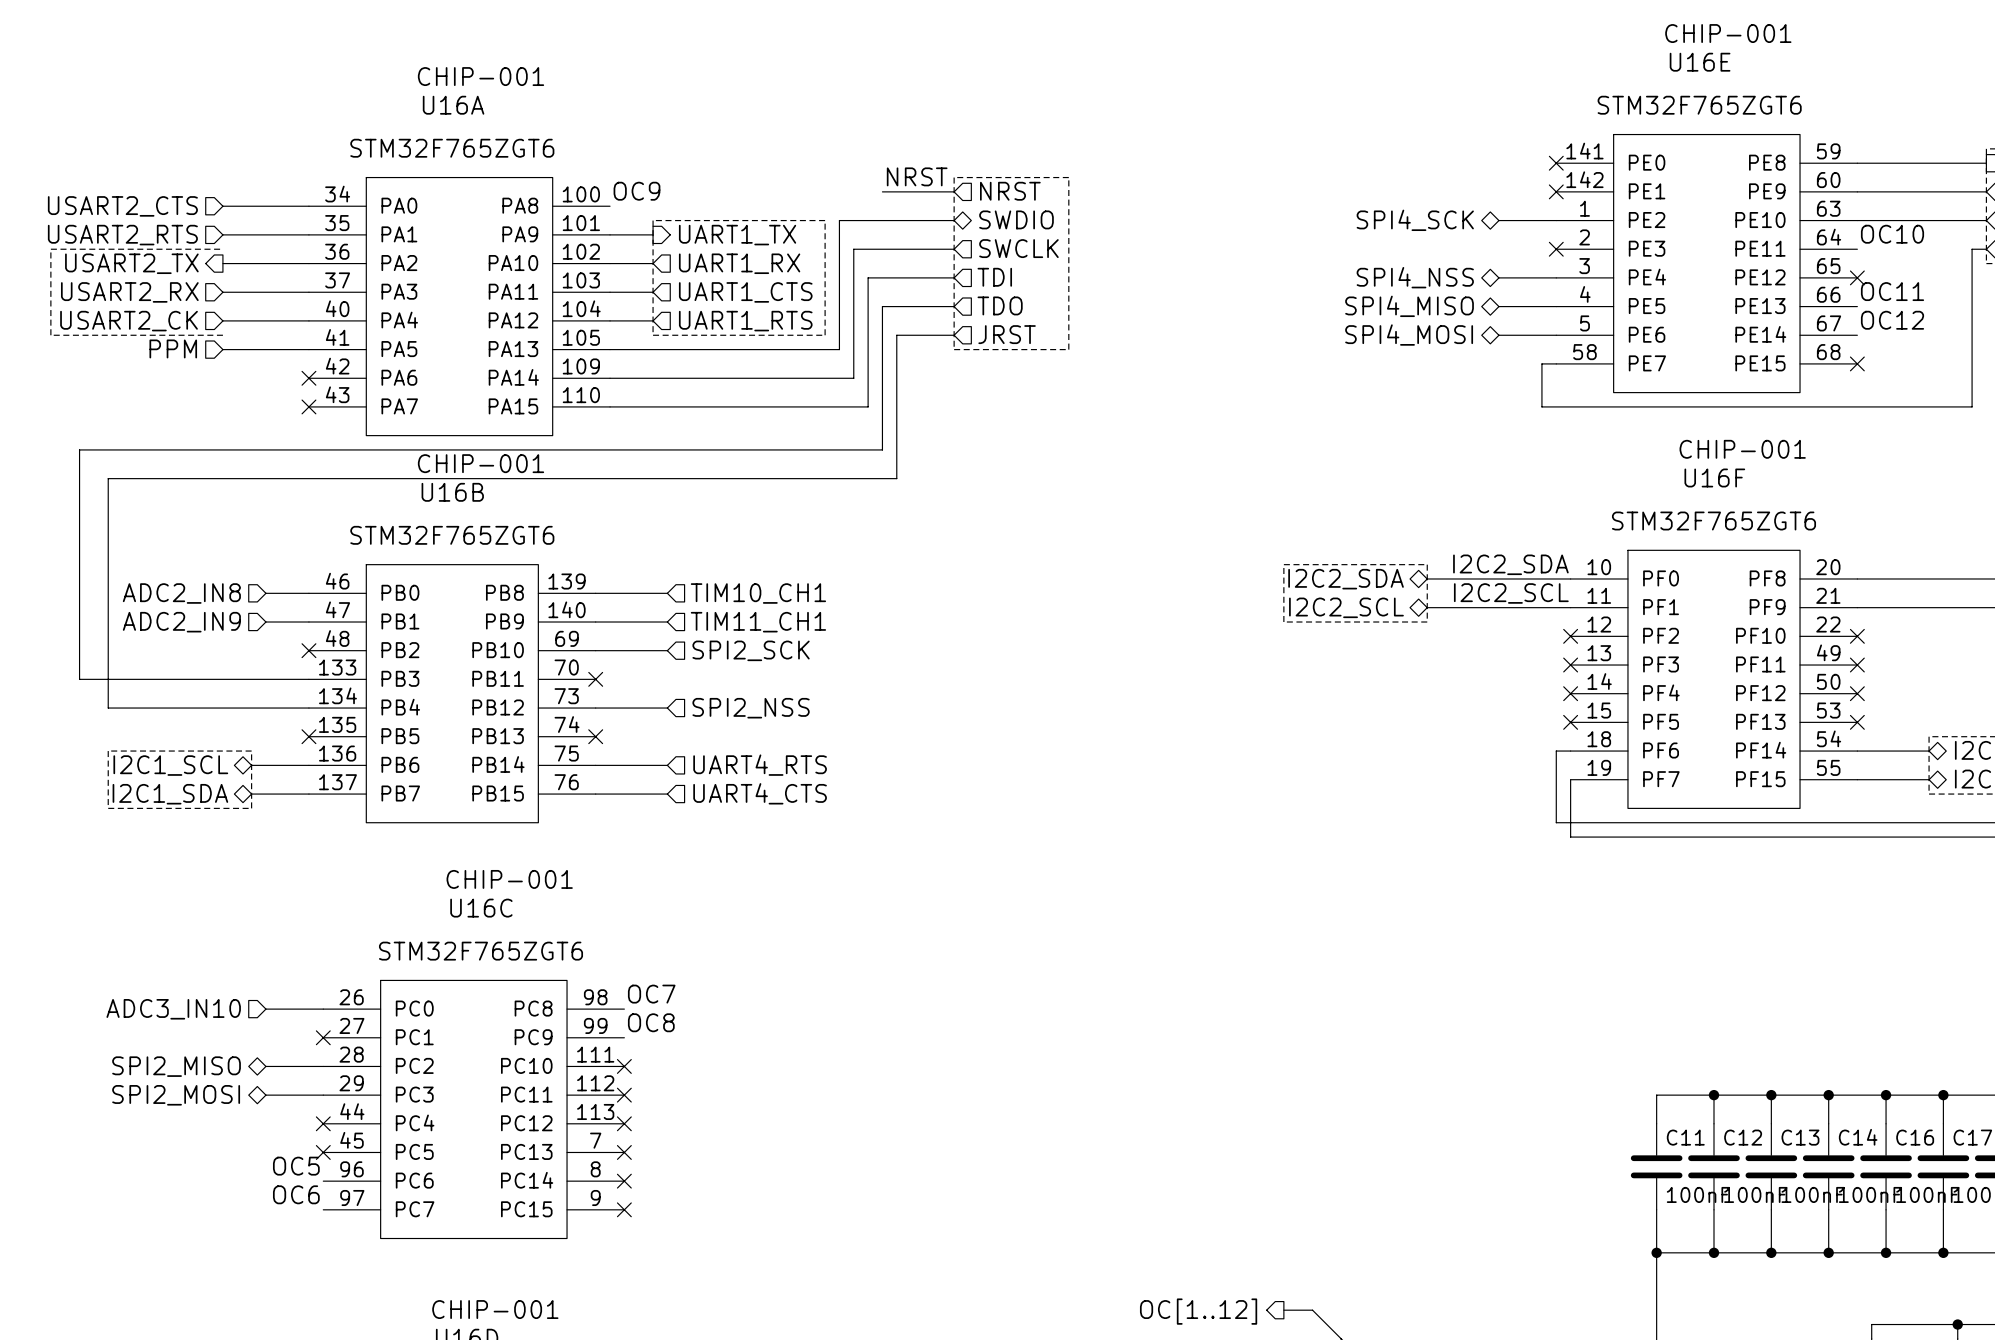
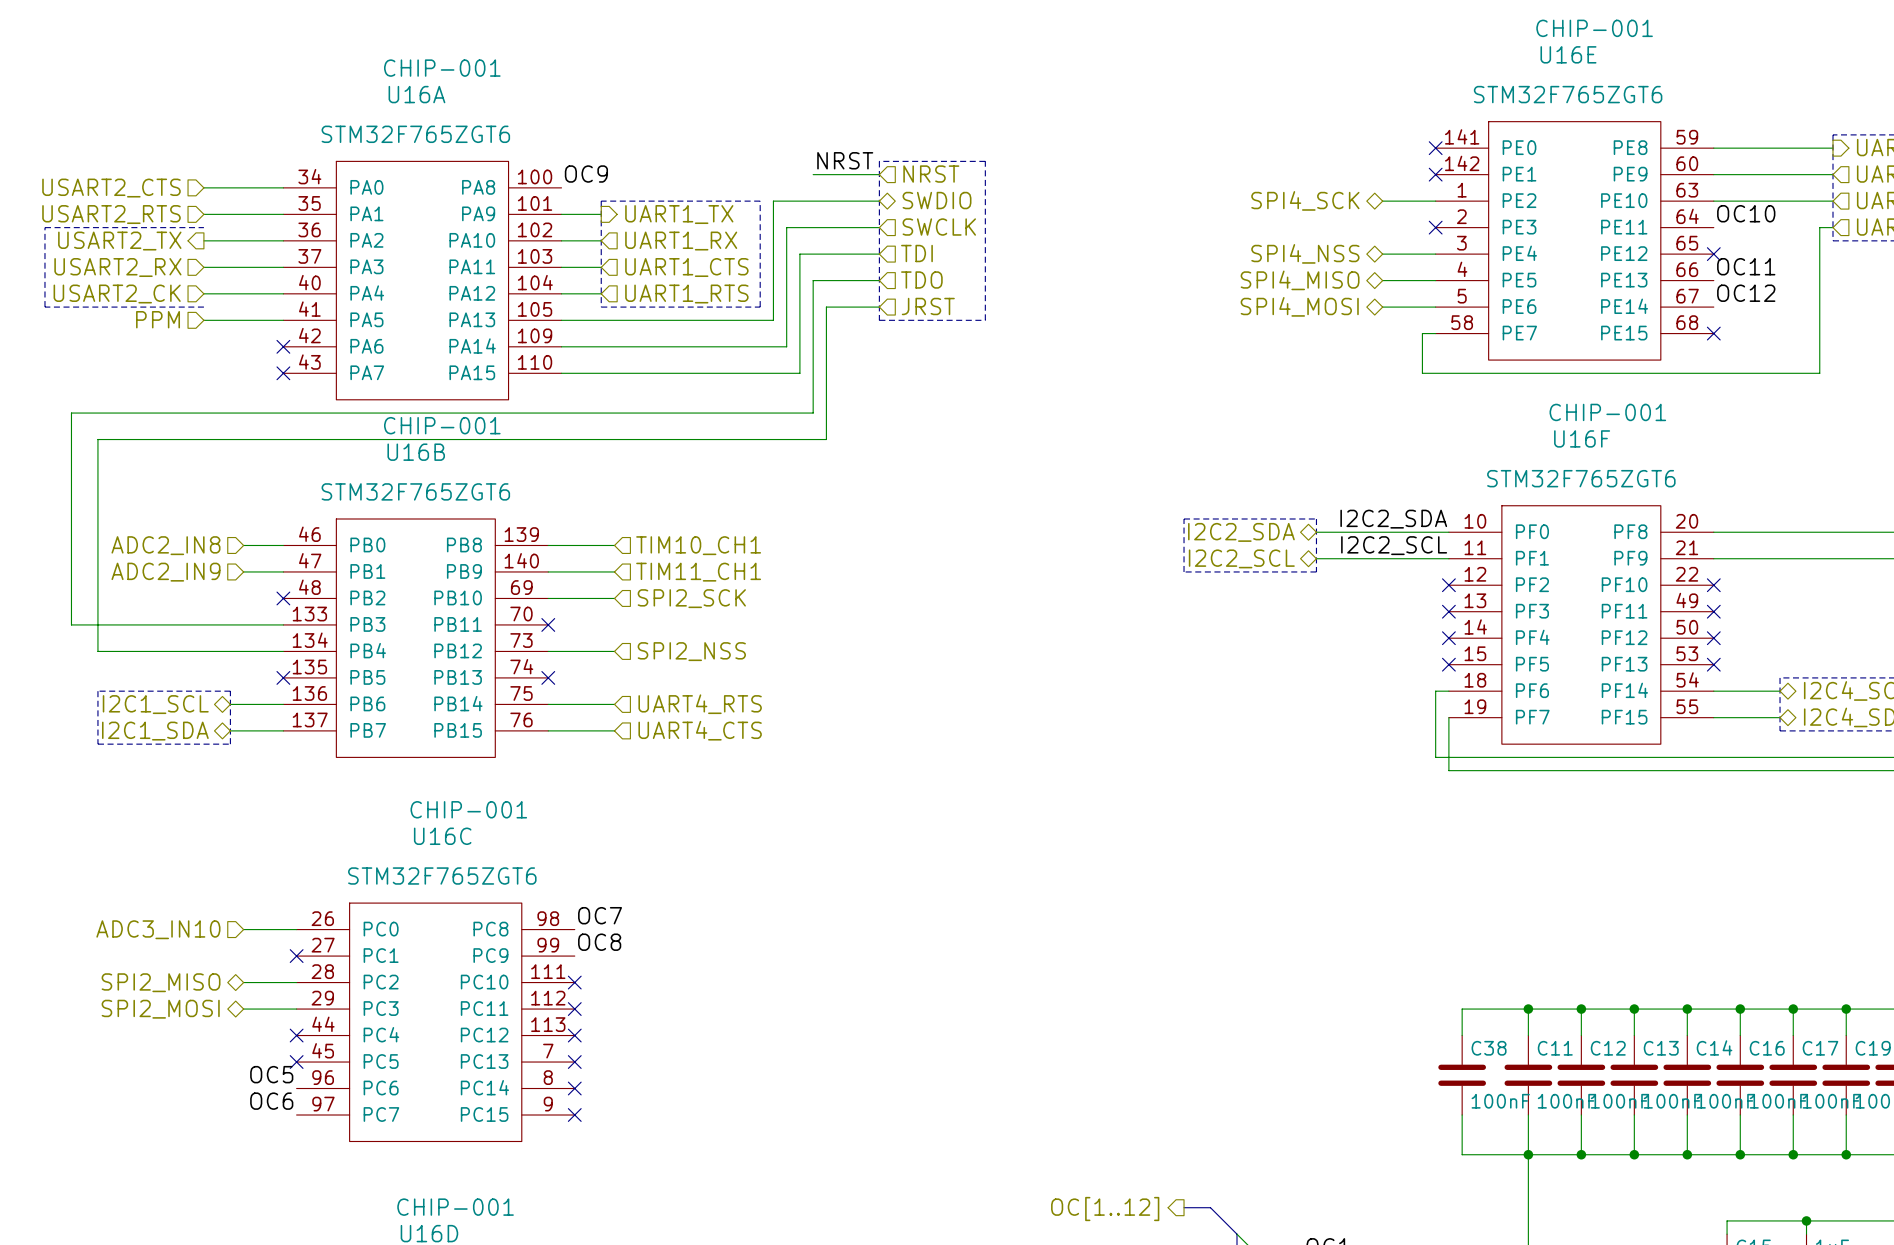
wire: none -> (1528, 1009) (1462, 1009) (1462, 1035)
junction: none -> (1528, 1009)
C38: none -> 100nF (1462, 1075)
wire: none -> (1462, 1115) (1462, 1154) (1528, 1154)

